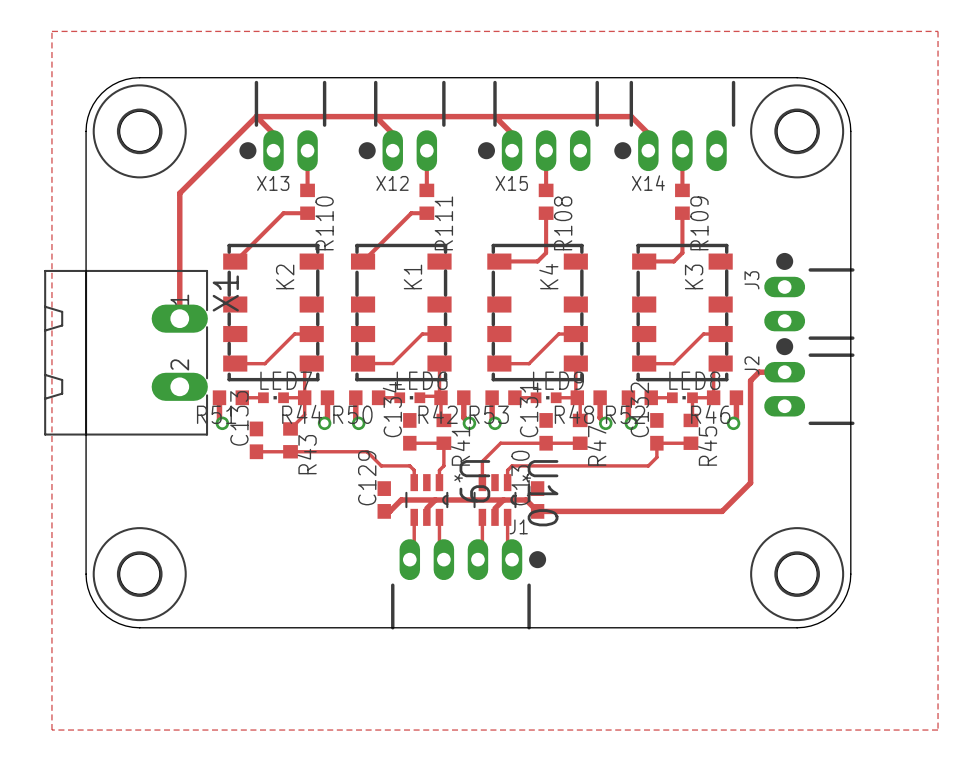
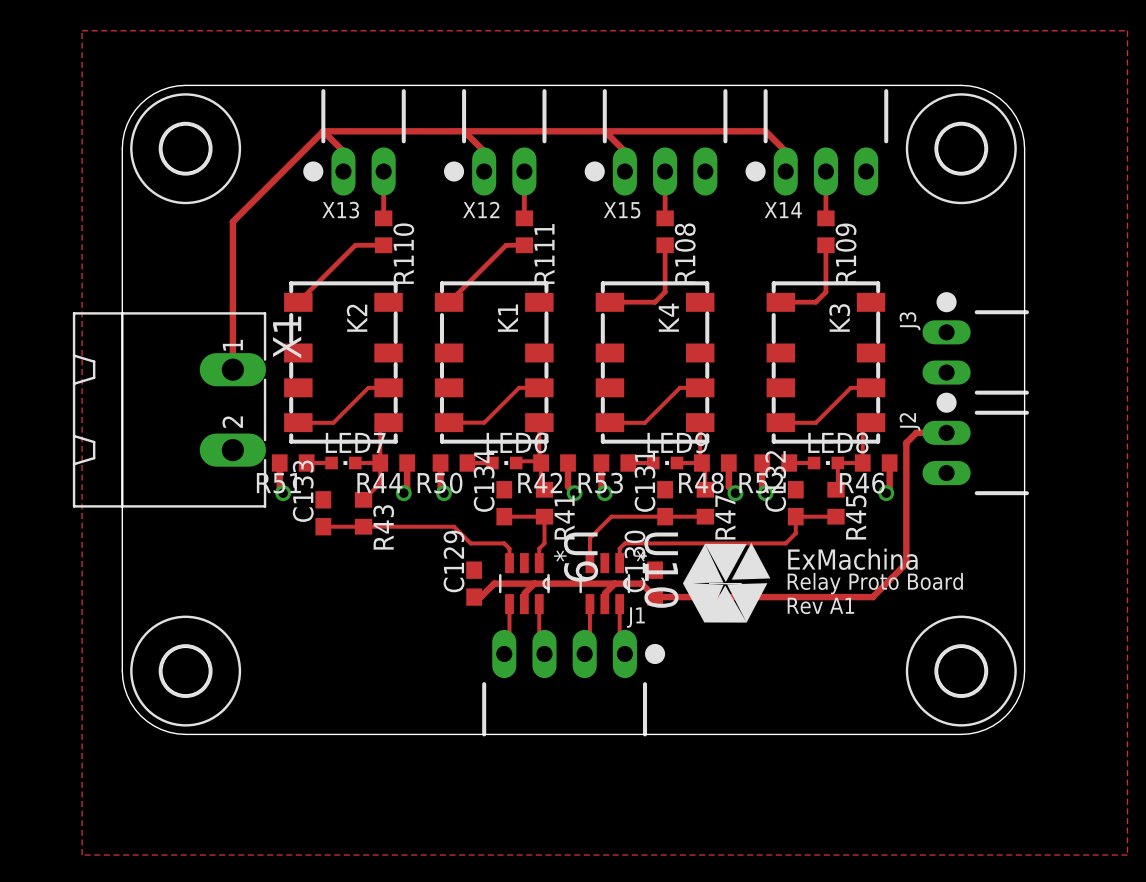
drawing: none -> [682, 542, 771, 623]
text: none -> Relay Proto Board (875, 583)
text: none -> Rev A1 (820, 605)

